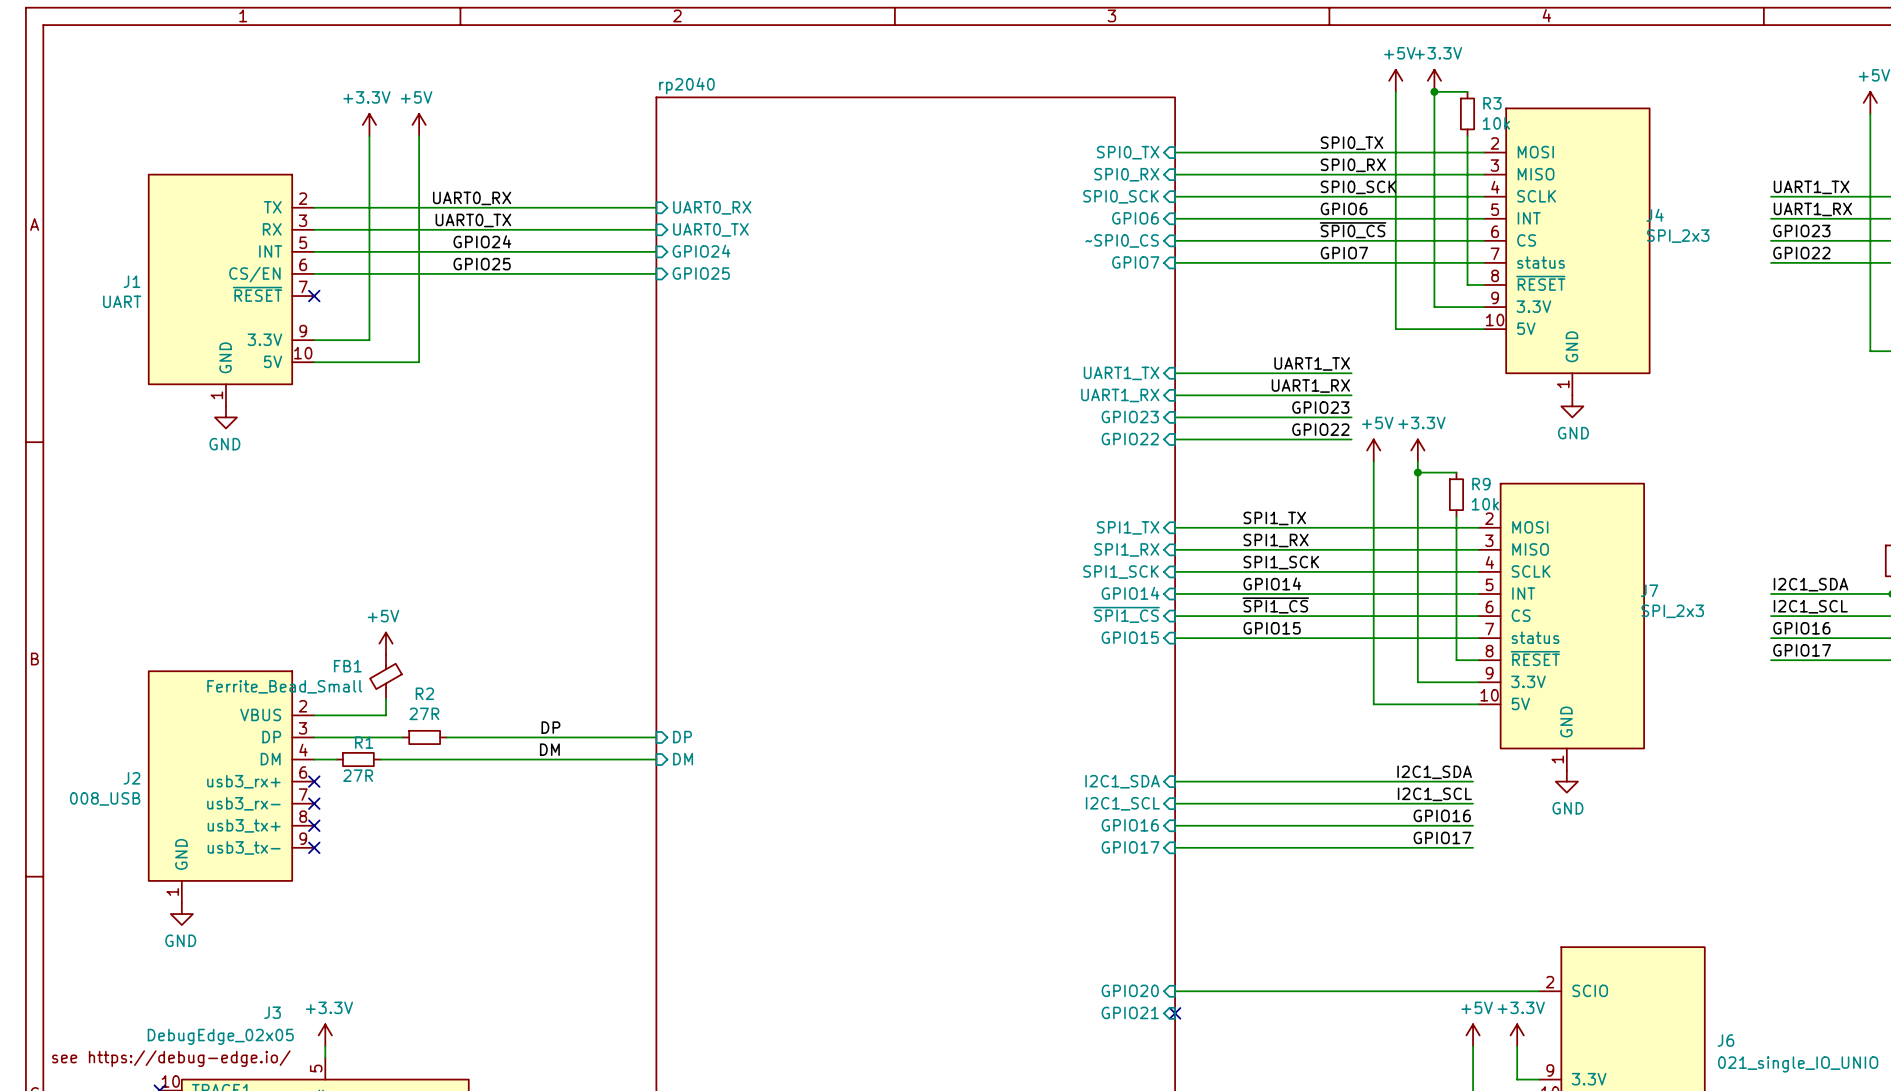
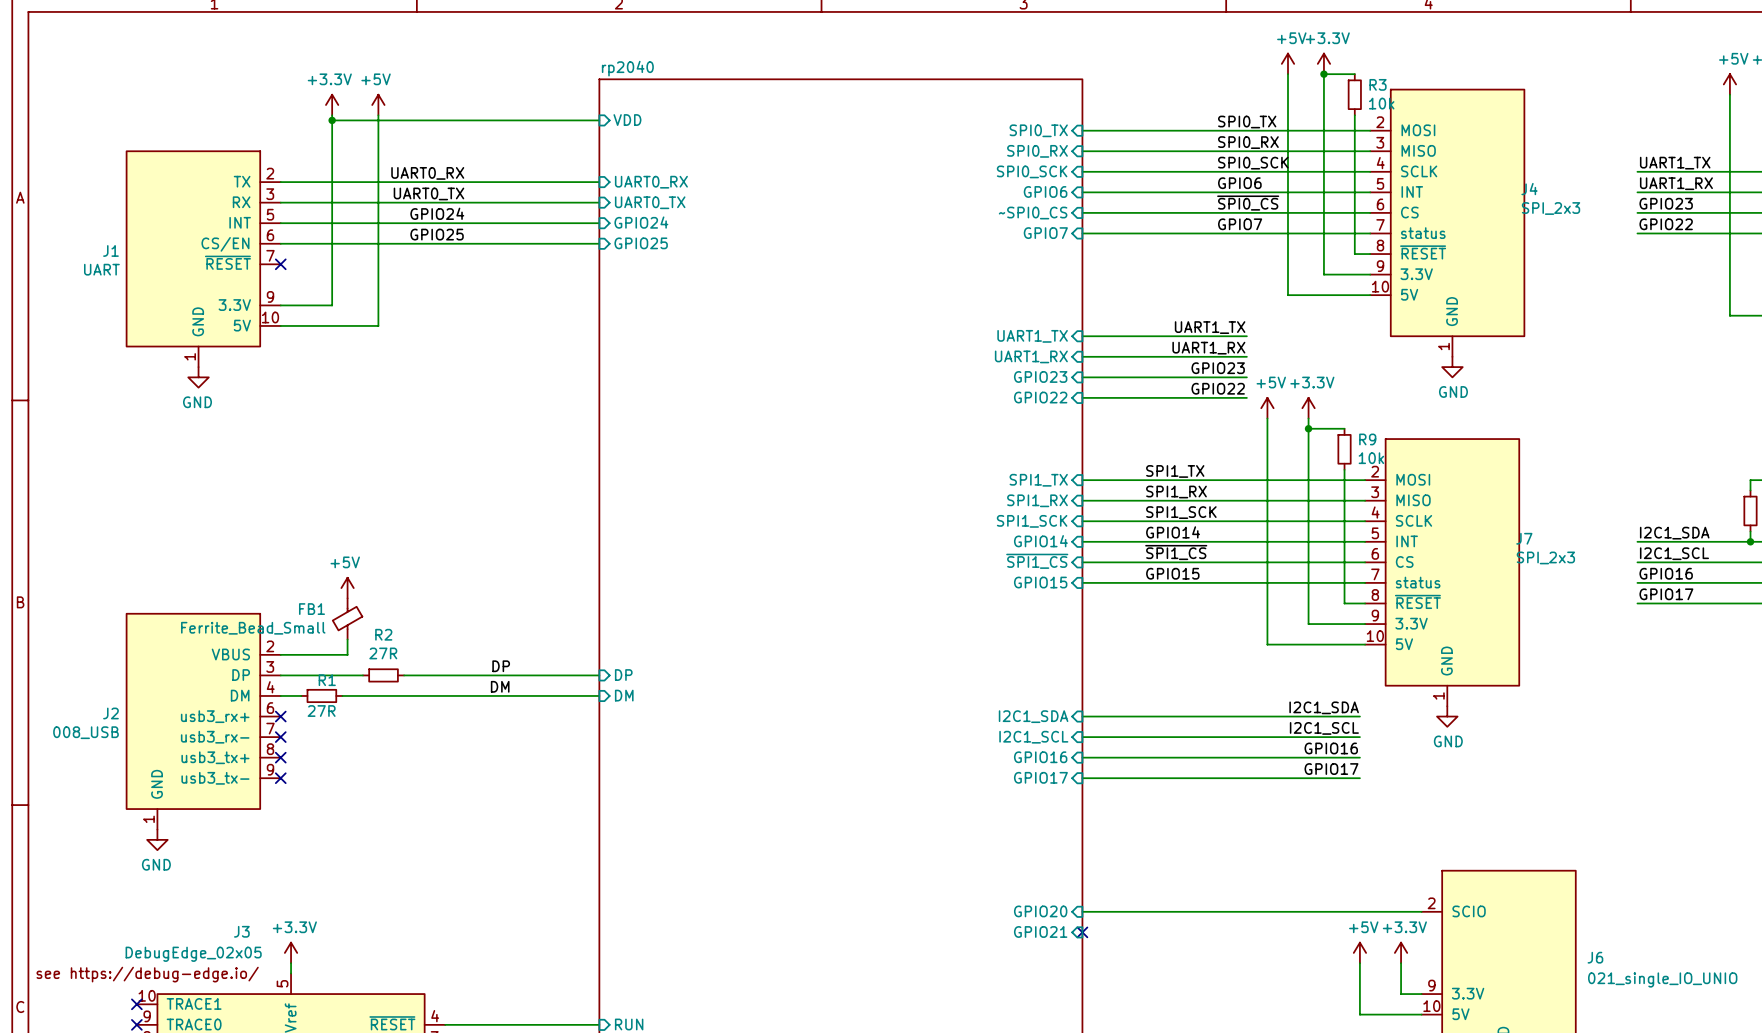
wire: none -> (332, 120) (599, 120)
junction: none -> (332, 120)
sheet pin: none -> VDD (627, 120)

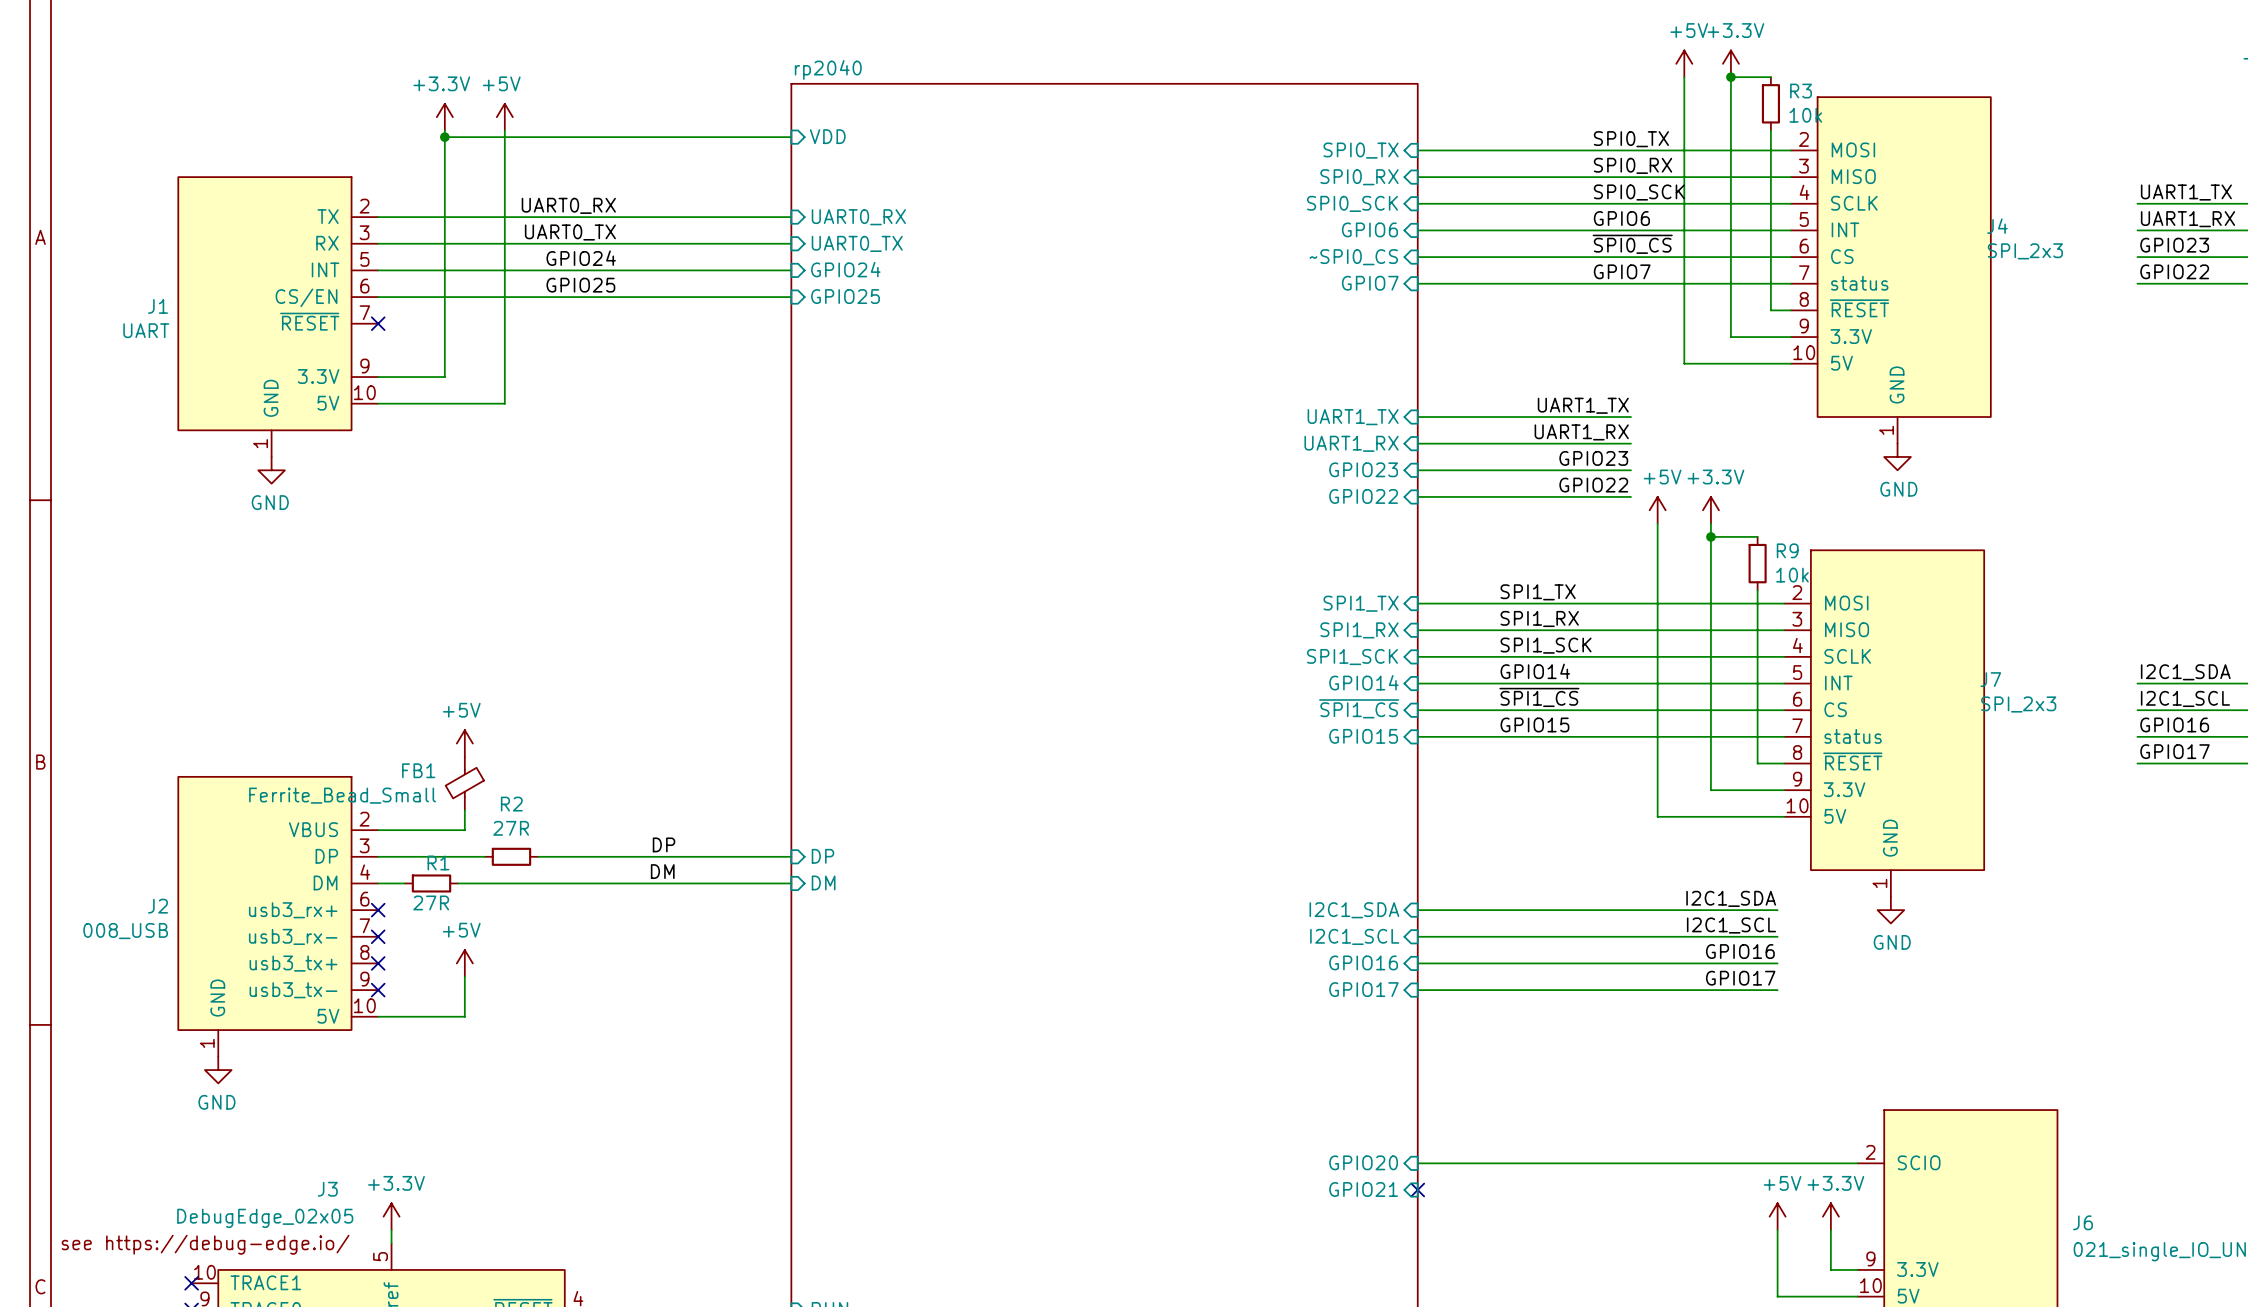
J2 symbol: [126, 613, 281, 830] -> [178, 776, 379, 1057]
power symbol: none -> +5V (464, 963)
wire: none -> (464, 976) (464, 1016) (378, 1016)

